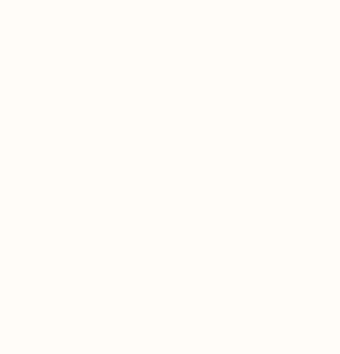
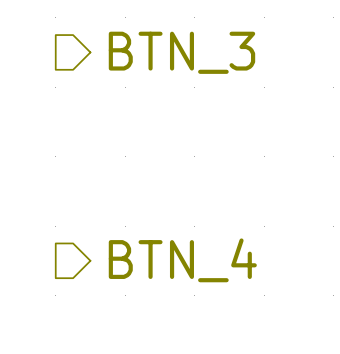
hierarchical label: none -> BTN_3 (181, 52)
hierarchical label: none -> BTN_4 (182, 260)

